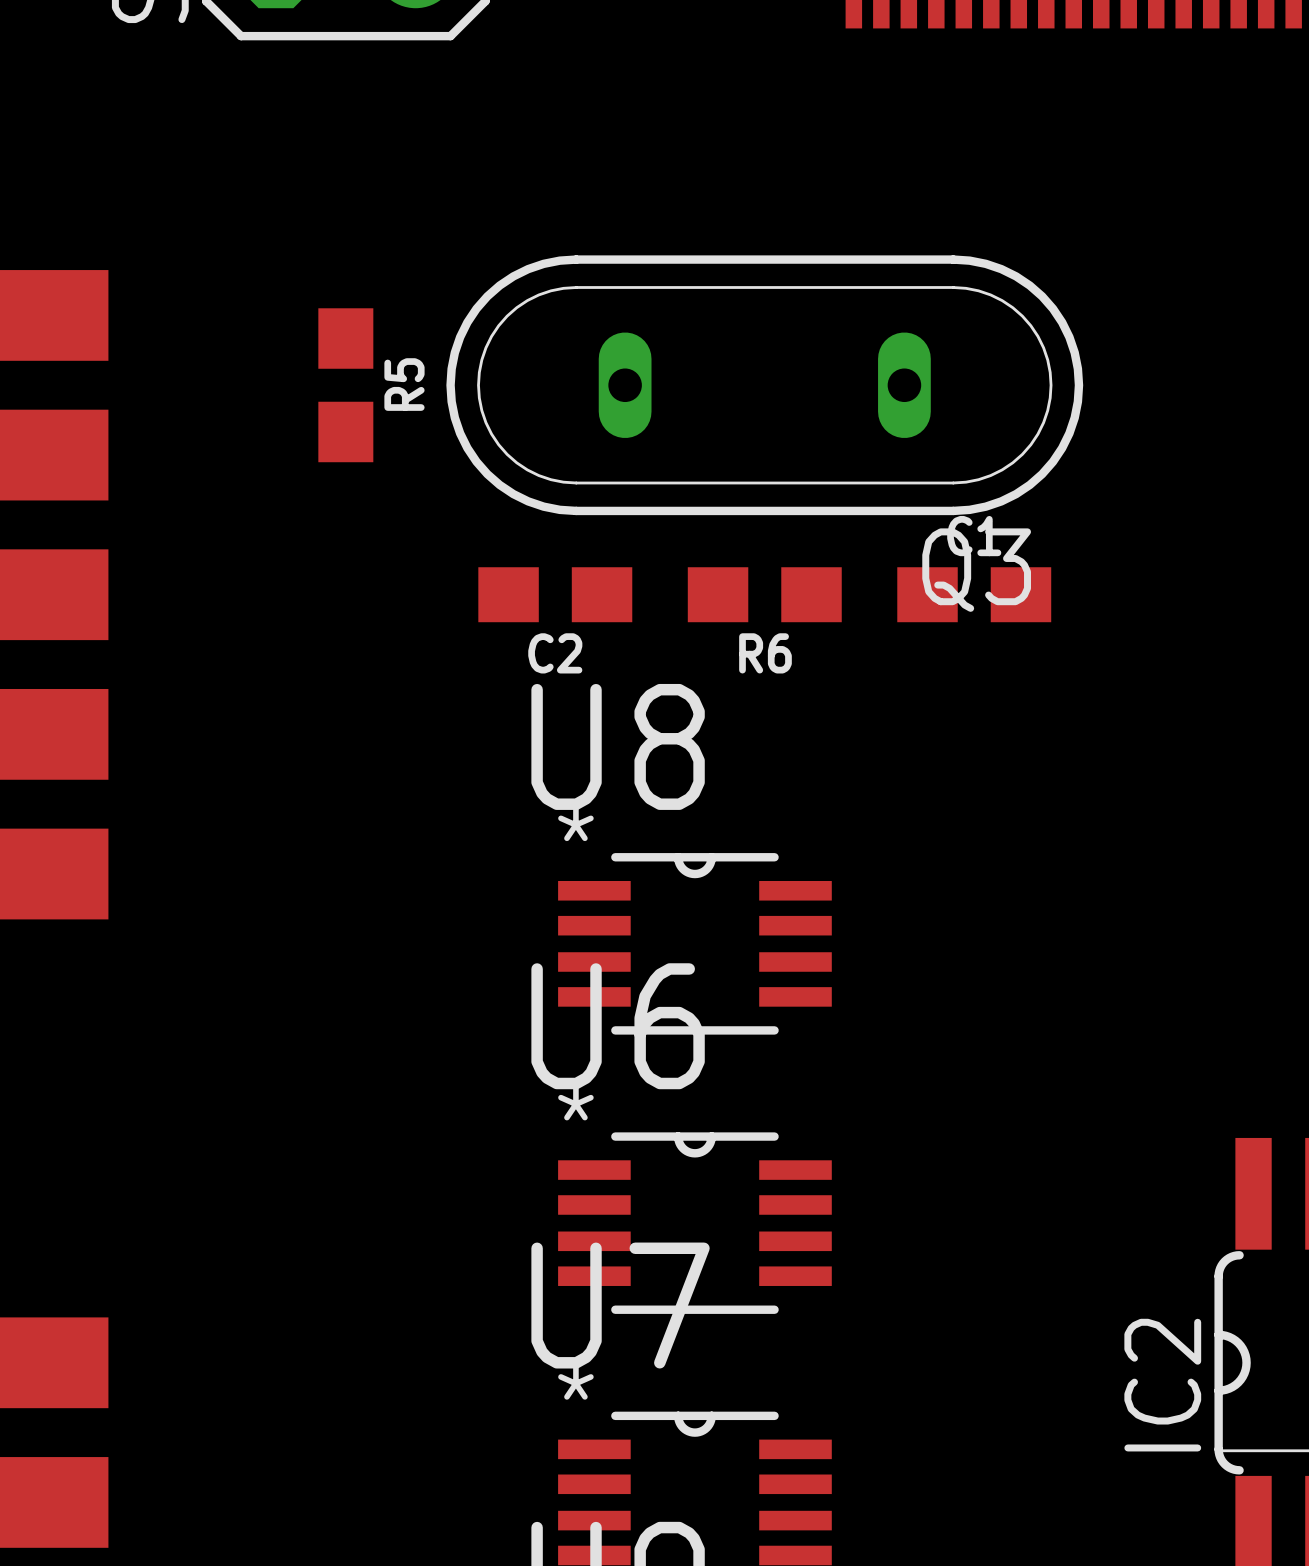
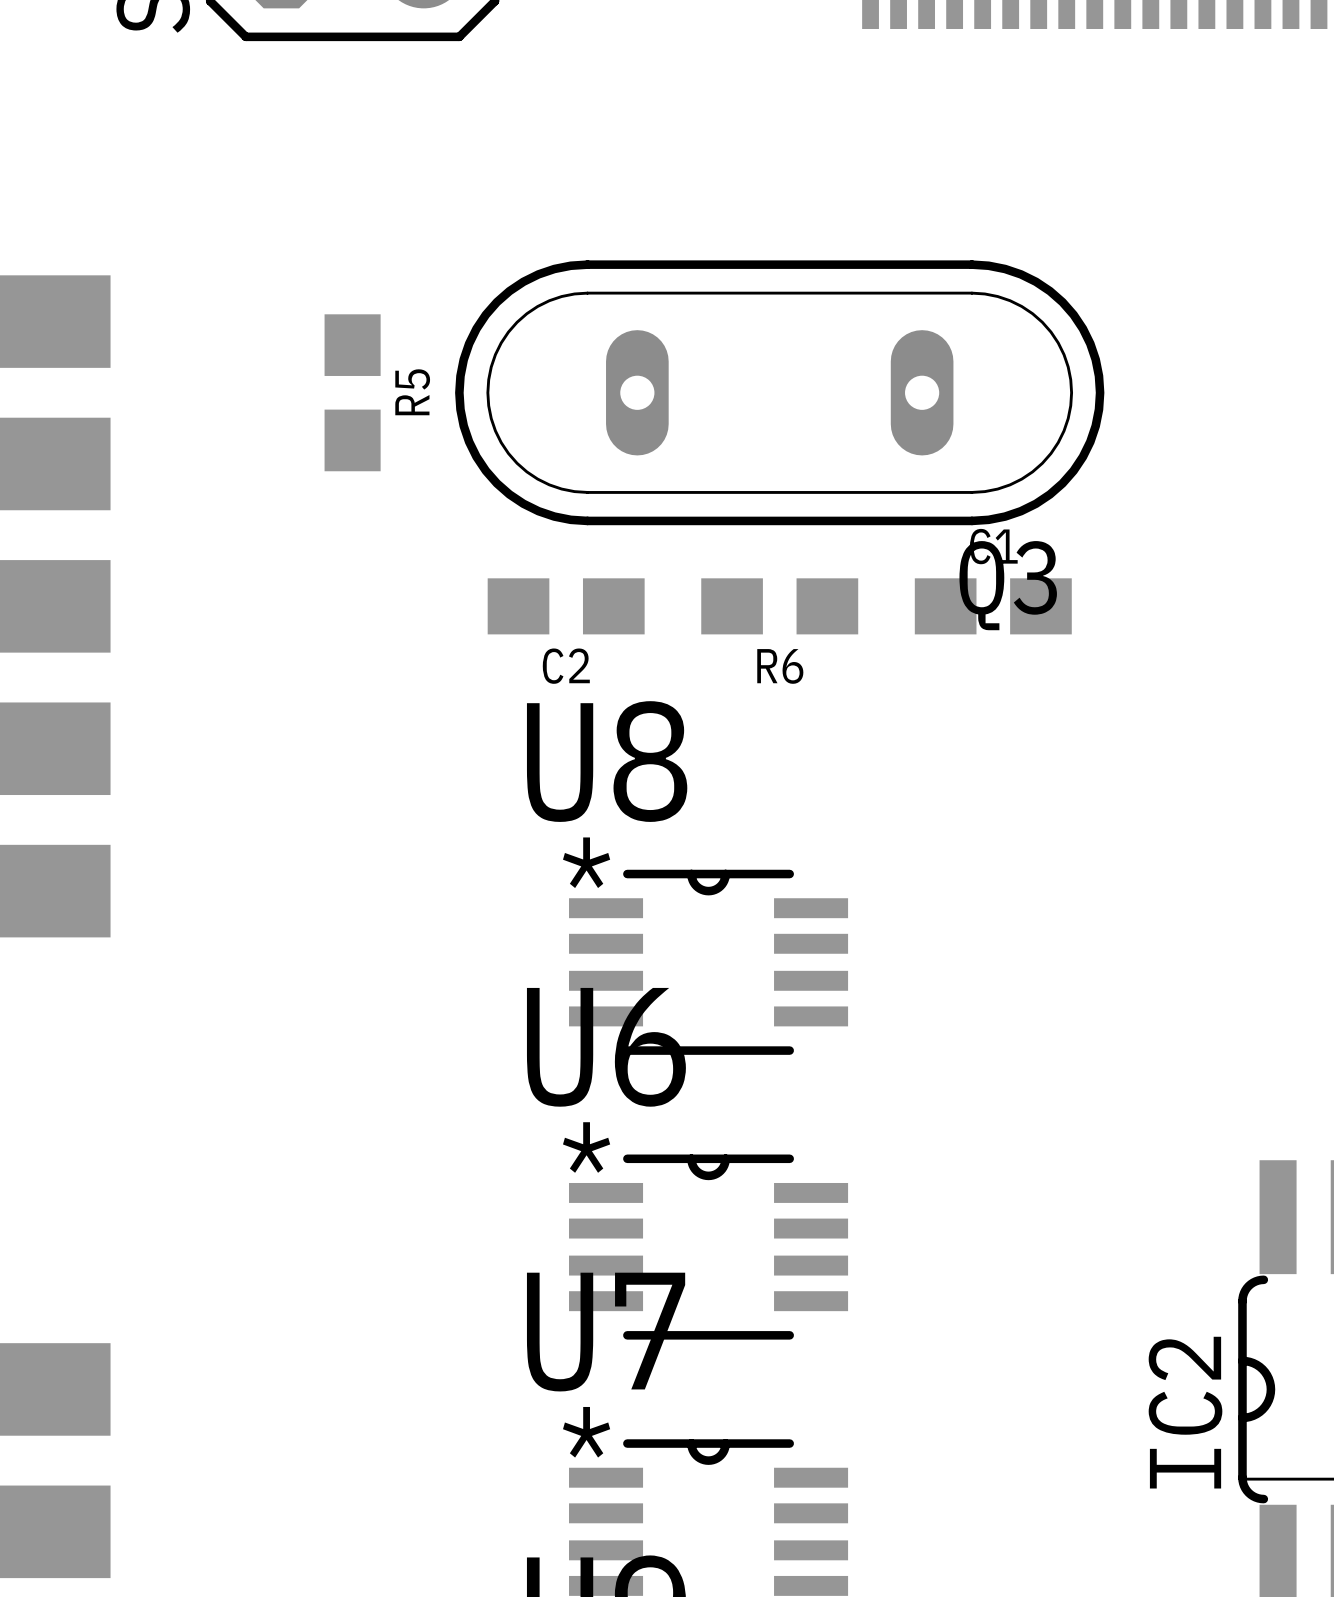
Q3 footprint: [446, 255, 1084, 516] -> [455, 260, 1105, 526]

